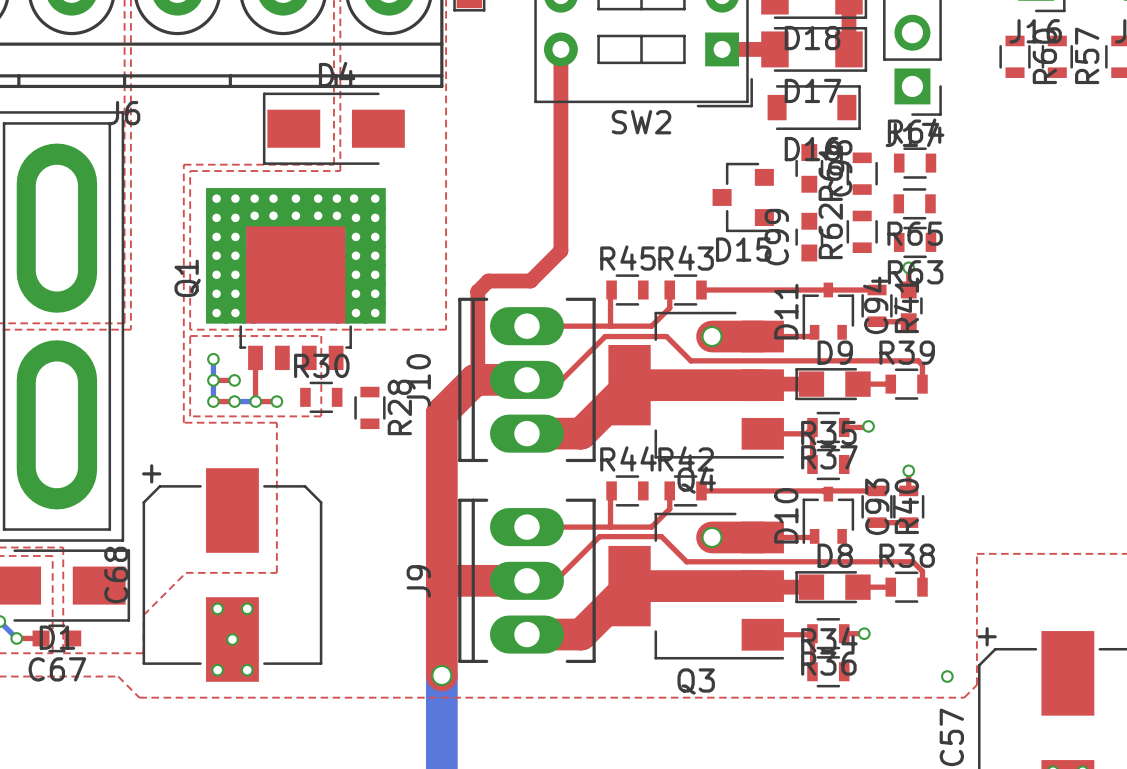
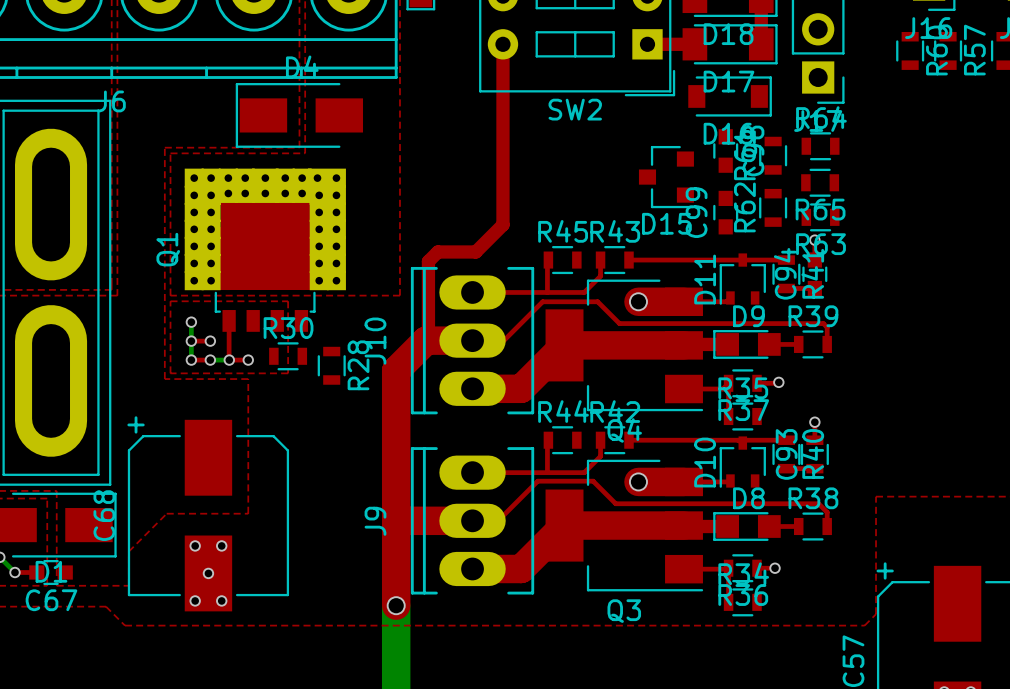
via: (947, 676) -> none

